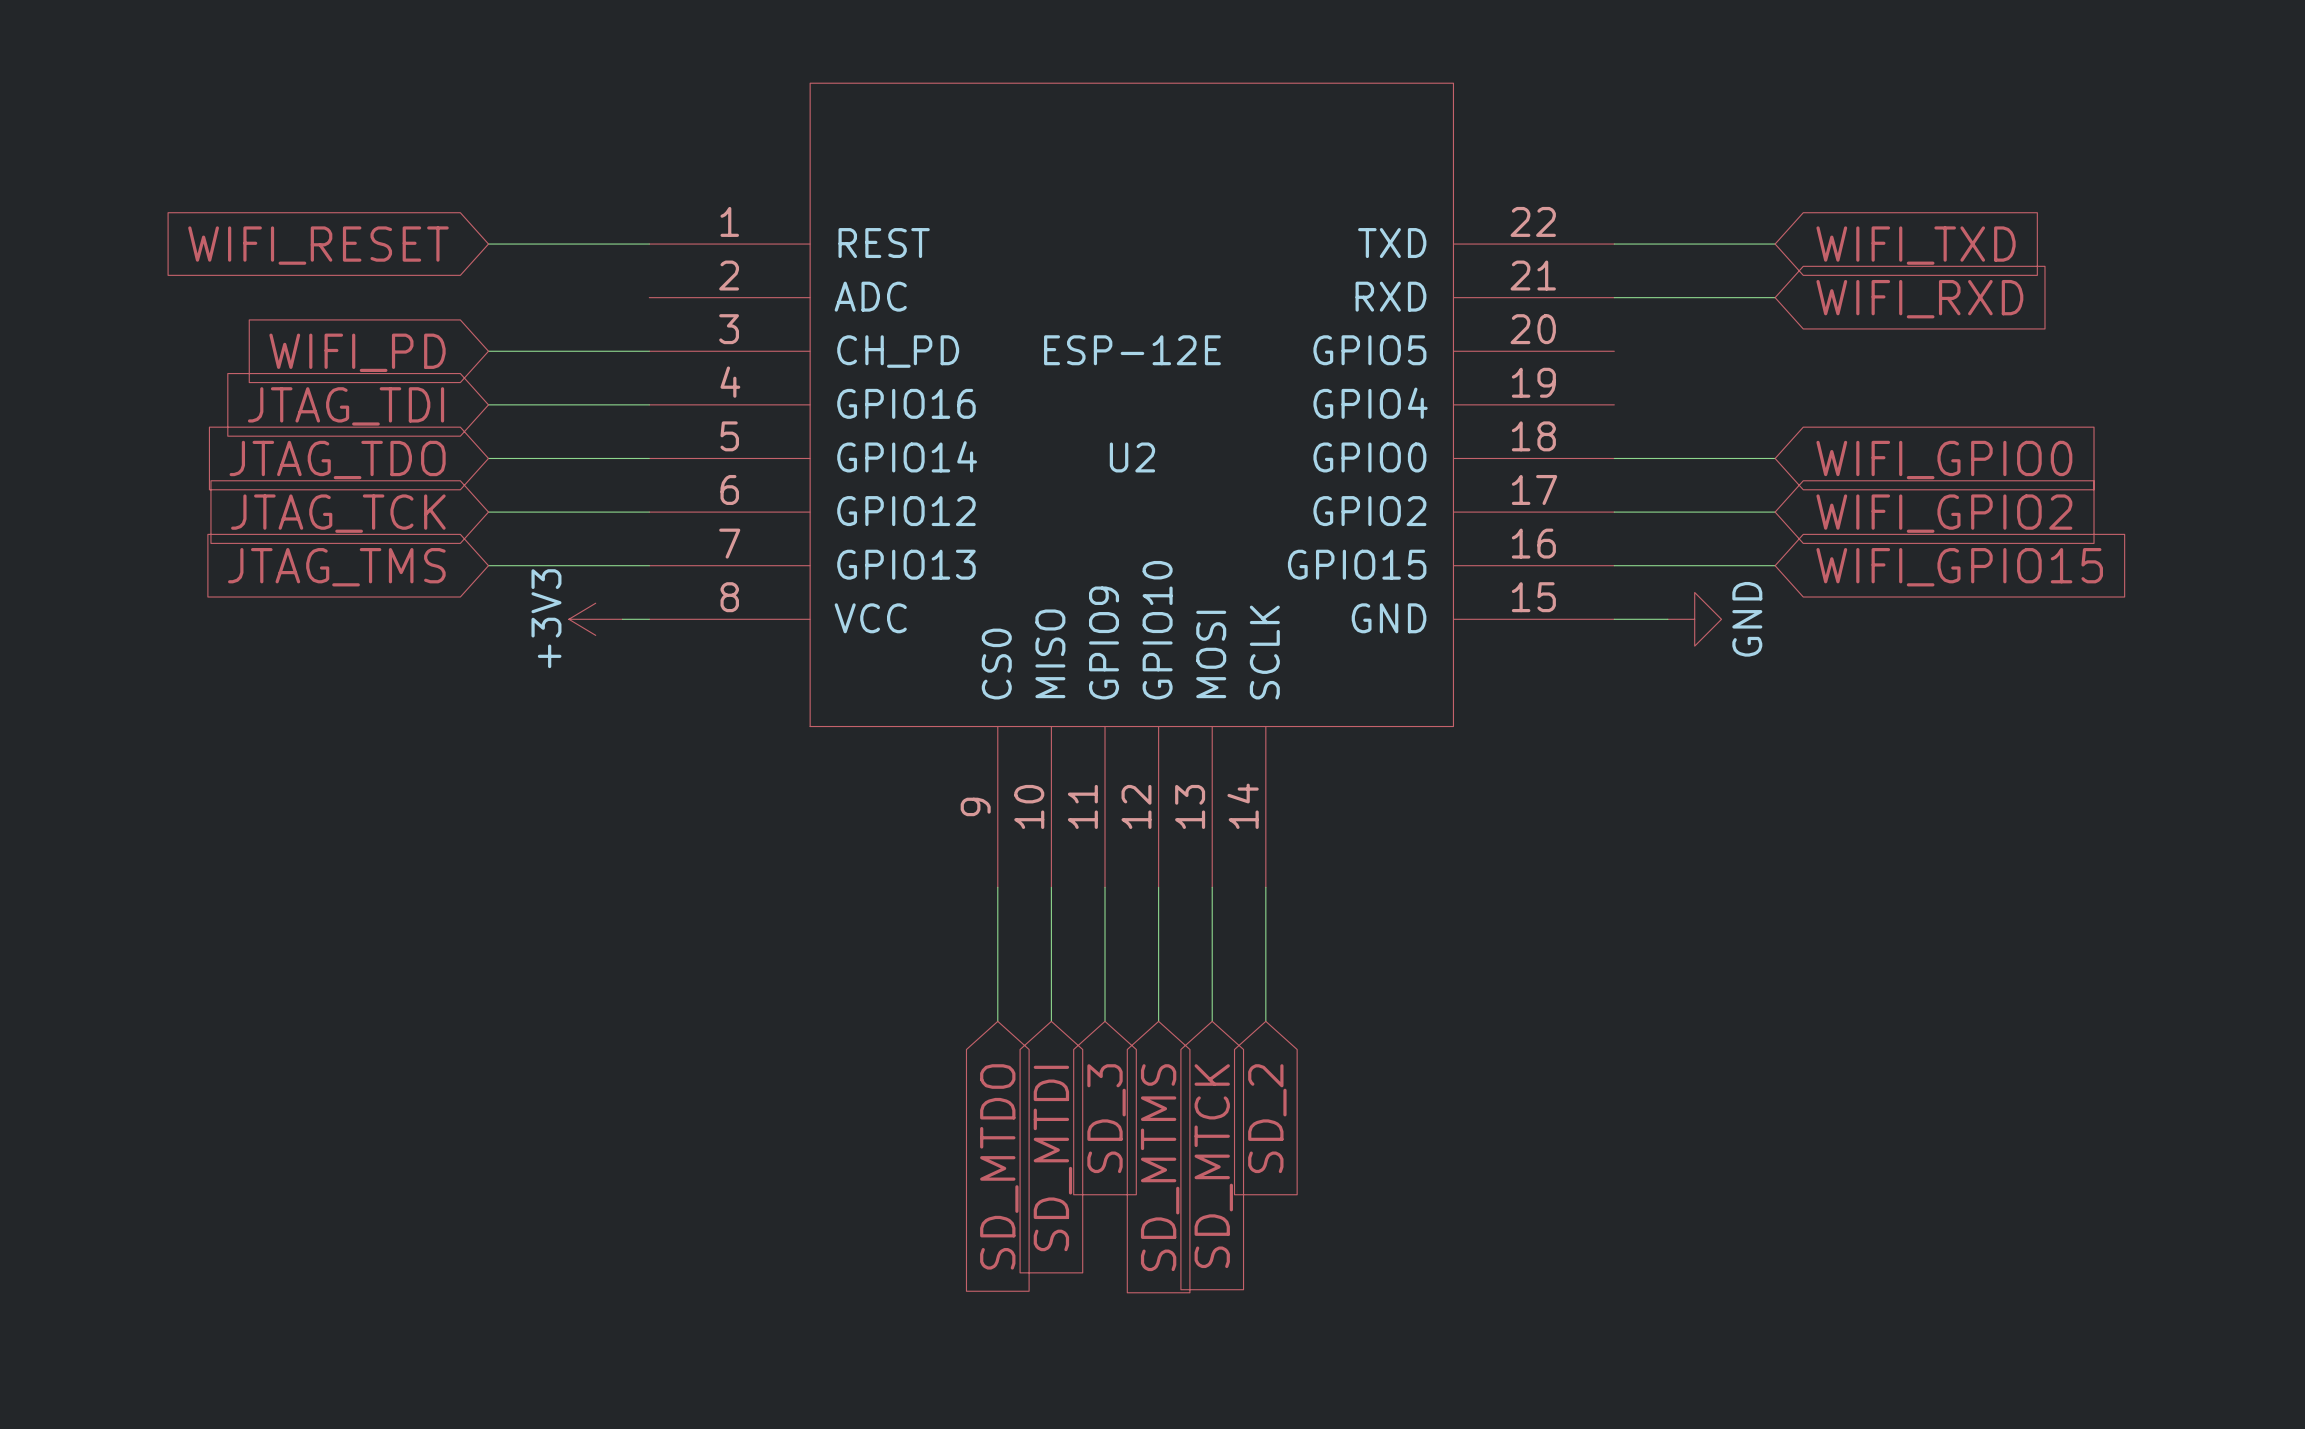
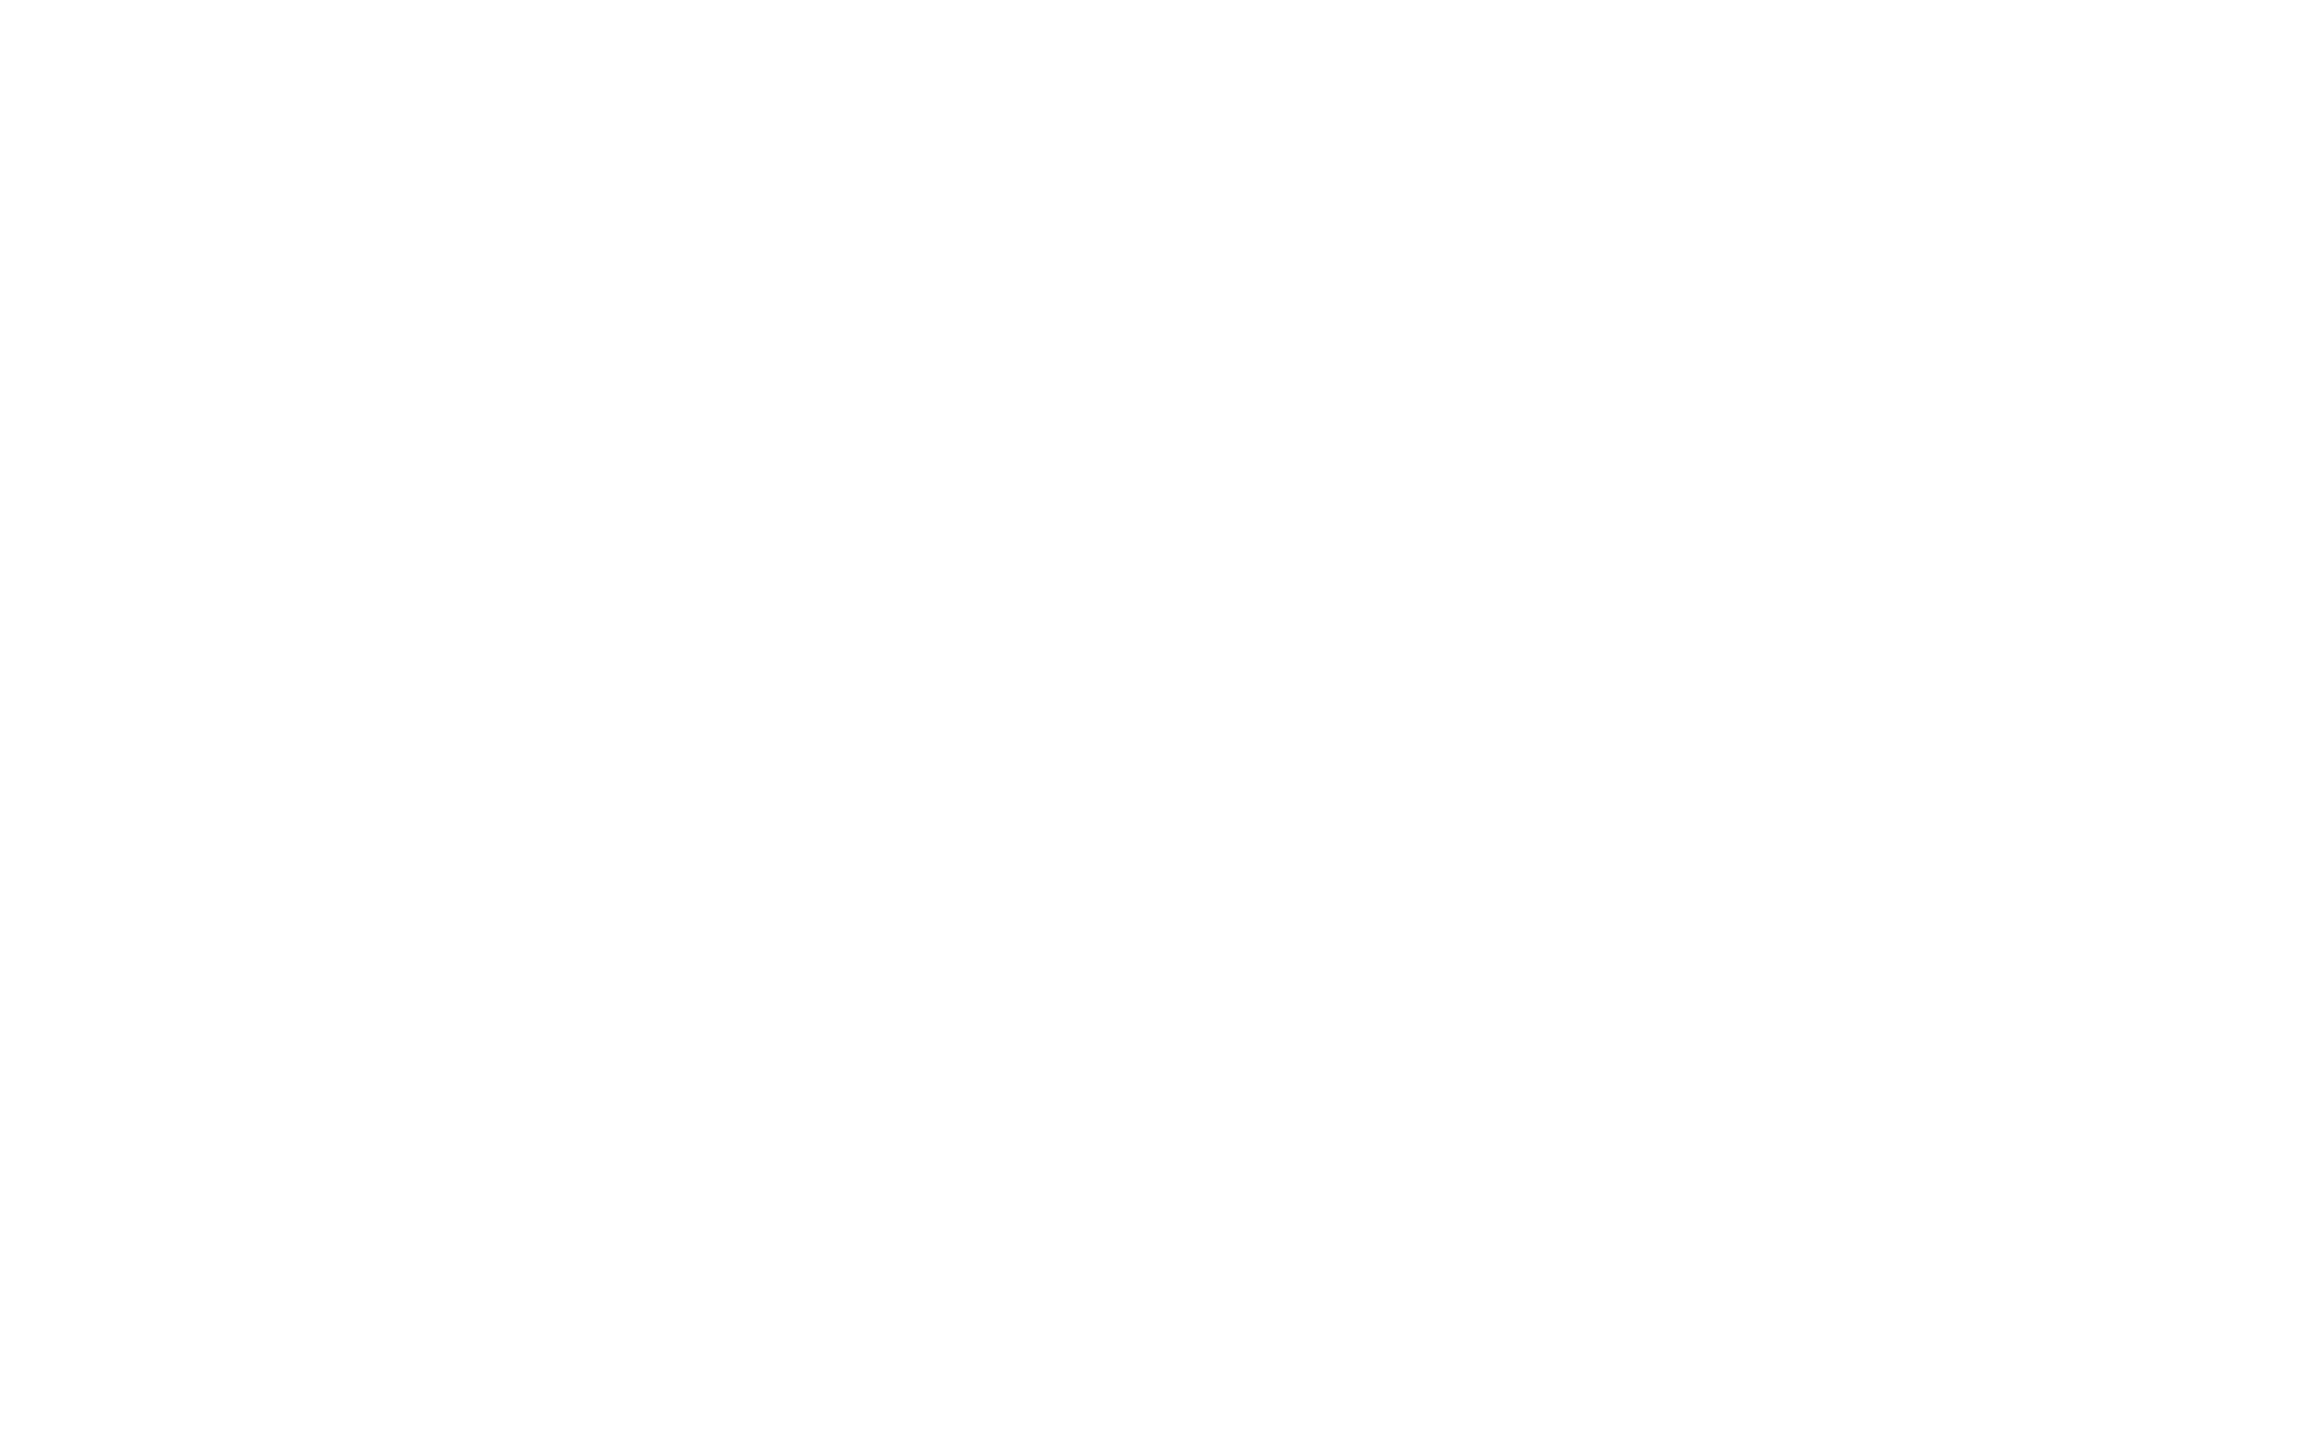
wire: (488, 244) (649, 244) -> none
wire: (1614, 244) (1775, 244) -> none
global label: WIFI_RESET (318, 245) -> none
global label: WIFI_TXD (1916, 245) -> none
wire: (1614, 297) (1775, 297) -> none
global label: WIFI_RXD (1919, 299) -> none
wire: (488, 351) (649, 351) -> none
global label: WIFI_PD (357, 352) -> none
wire: (488, 404) (649, 404) -> none
global label: JTAG_TDI (346, 406) -> none
wire: (488, 458) (649, 458) -> none
wire: (1614, 458) (1775, 458) -> none
global label: JTAG_TDO (337, 460) -> none
global label: WIFI_GPIO0 (1944, 460) -> none
U2: ESP-12E (1131, 485) -> none
wire: (488, 512) (649, 512) -> none
wire: (1614, 512) (1775, 512) -> none
global label: JTAG_TCK (338, 513) -> none
global label: WIFI_GPIO2 (1944, 513) -> none
wire: (488, 565) (649, 565) -> none
wire: (1614, 565) (1775, 565) -> none
global label: JTAG_TMS (336, 567) -> none
global label: WIFI_GPIO15 (1959, 567) -> none
power symbol: +3V3 (595, 619) -> none
wire: (622, 619) (649, 619) -> none
wire: (1614, 619) (1667, 619) -> none
power symbol: GND (1694, 619) -> none
wire: (997, 887) (997, 1021) -> none
wire: (1051, 887) (1051, 1021) -> none
wire: (1105, 887) (1105, 1021) -> none
wire: (1158, 887) (1158, 1021) -> none
wire: (1212, 887) (1212, 1021) -> none
wire: (1265, 887) (1265, 1021) -> none
global label: SD_3 (1106, 1118) -> none
global label: SD_2 (1267, 1118) -> none
global label: SD_MTDI (1052, 1158) -> none
global label: SD_MTDO (999, 1166) -> none
global label: SD_MTCK (1213, 1166) -> none
global label: SD_MTMS (1160, 1167) -> none

